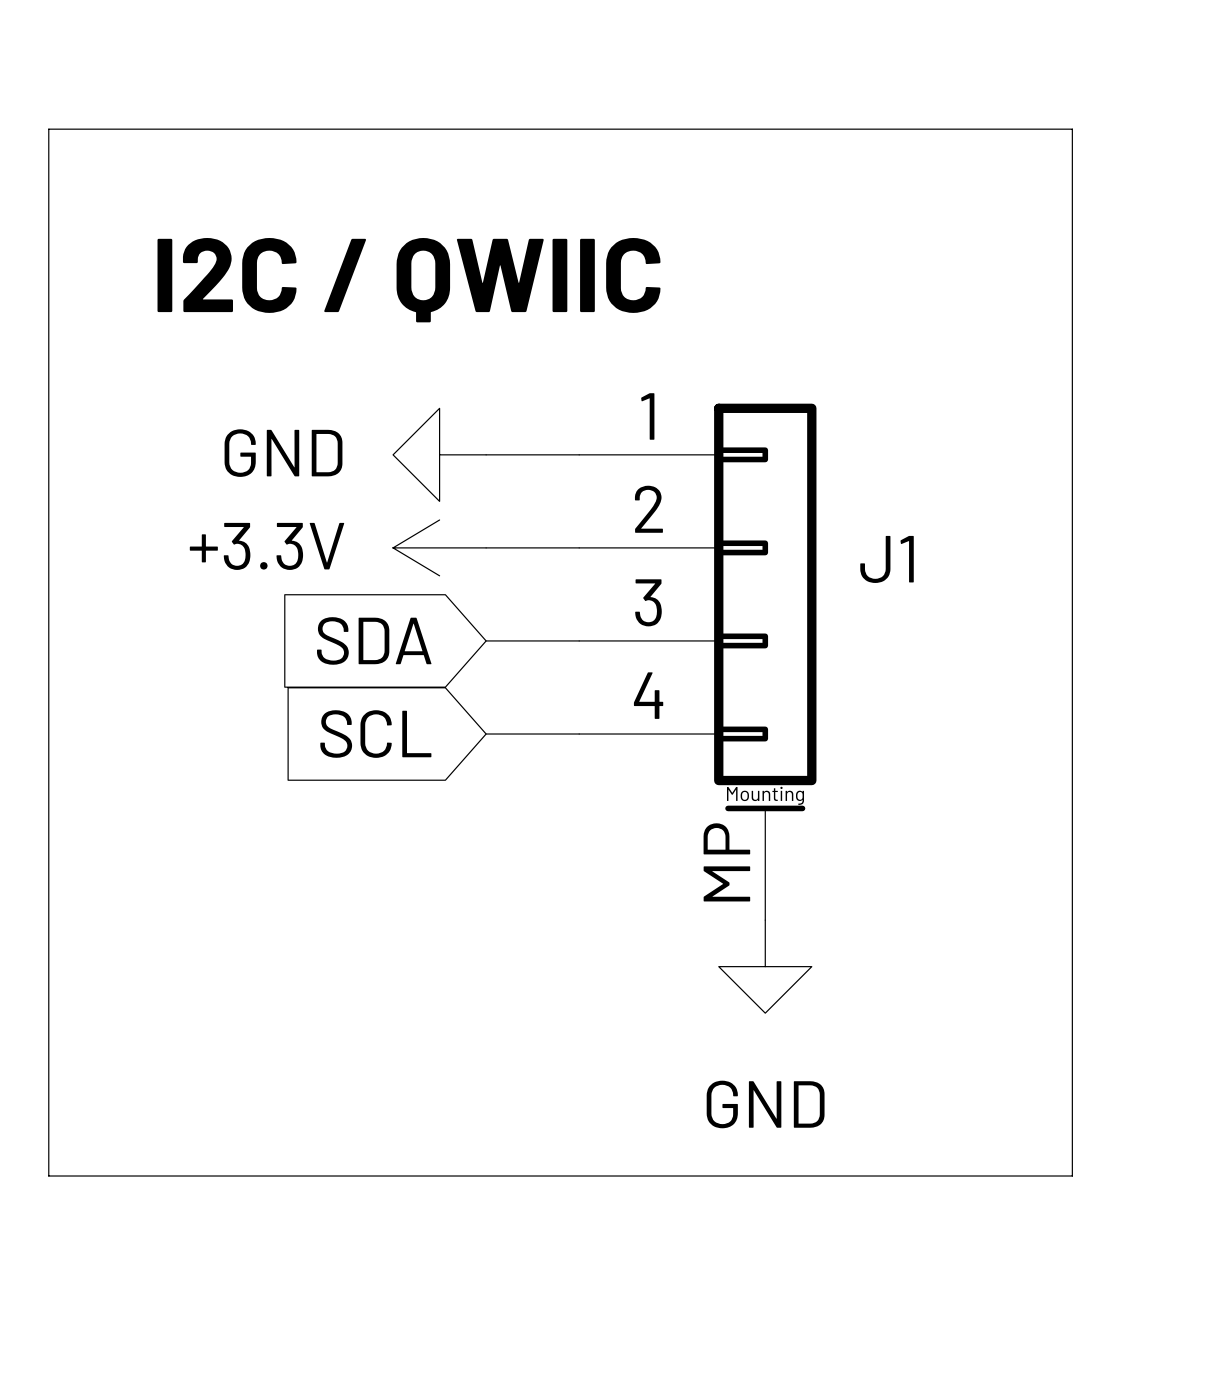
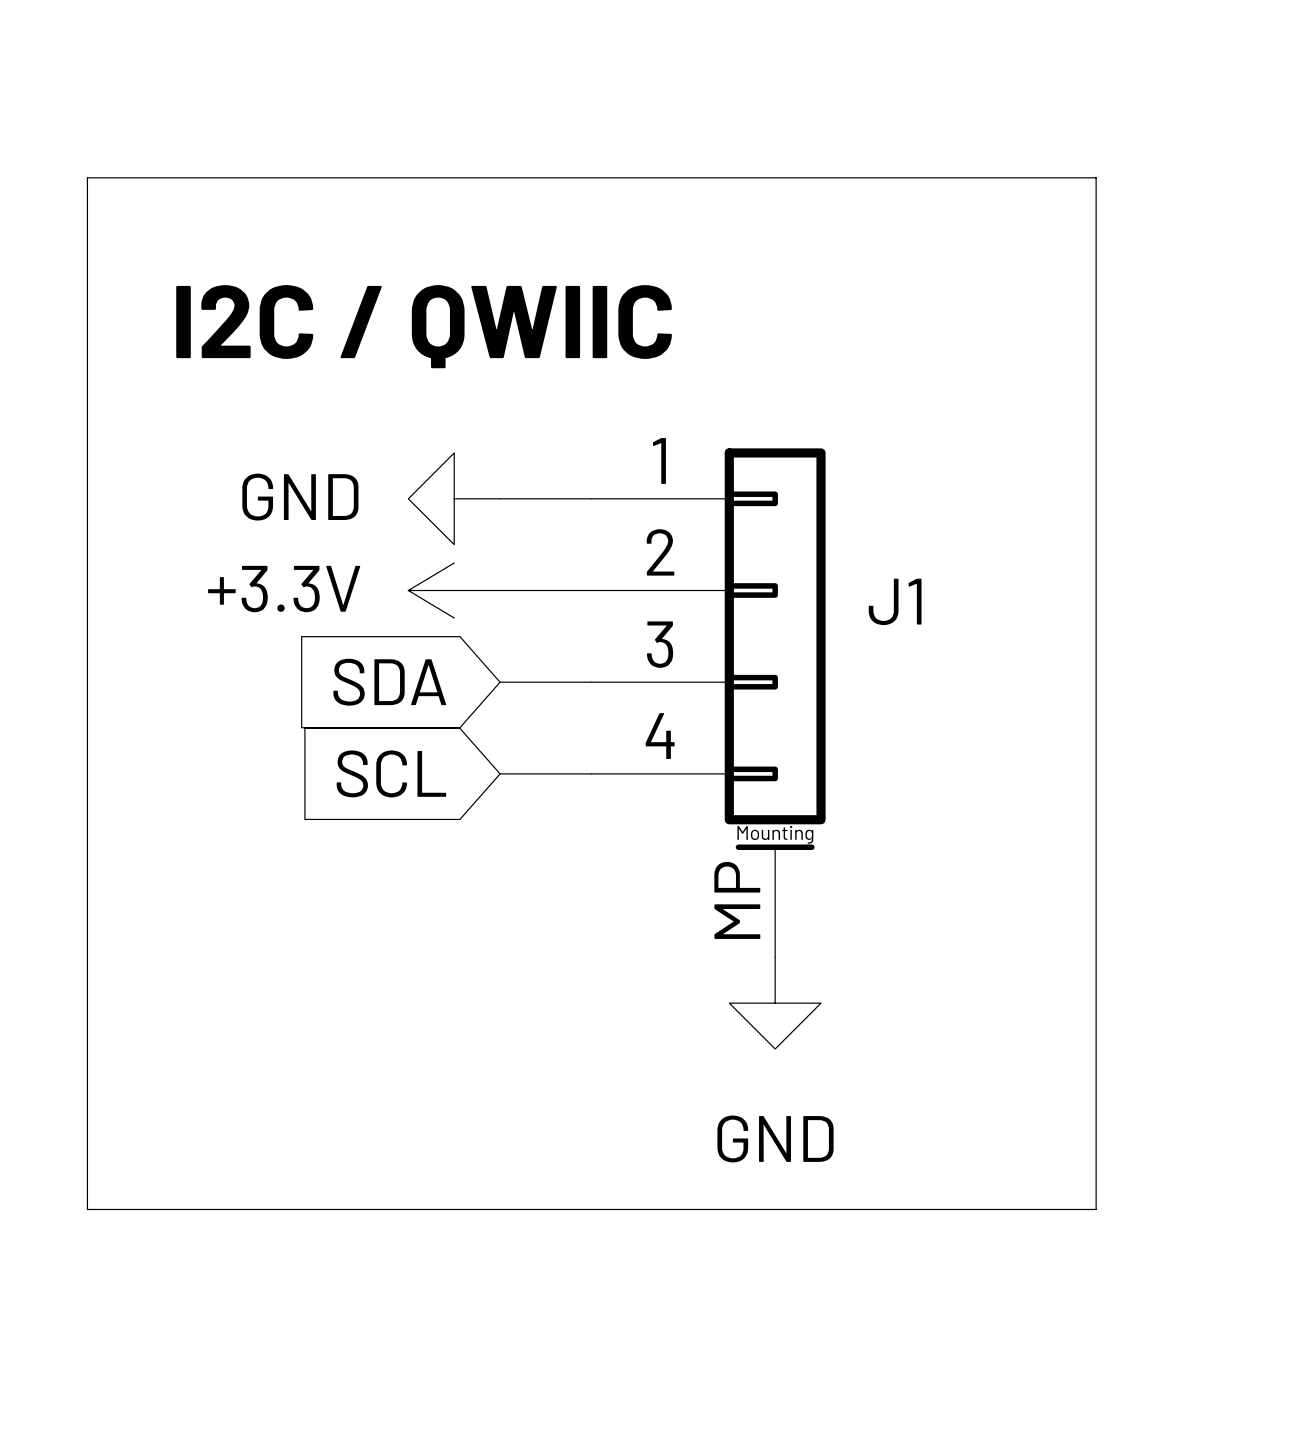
line: (67, 129) (48, 129) (48, 1176) (67, 1176) -> (87, 177) (87, 1209)
line: (1072, 129) (1072, 1176) -> (1077, 177) (1096, 177) (1096, 1209) (1077, 1209)

